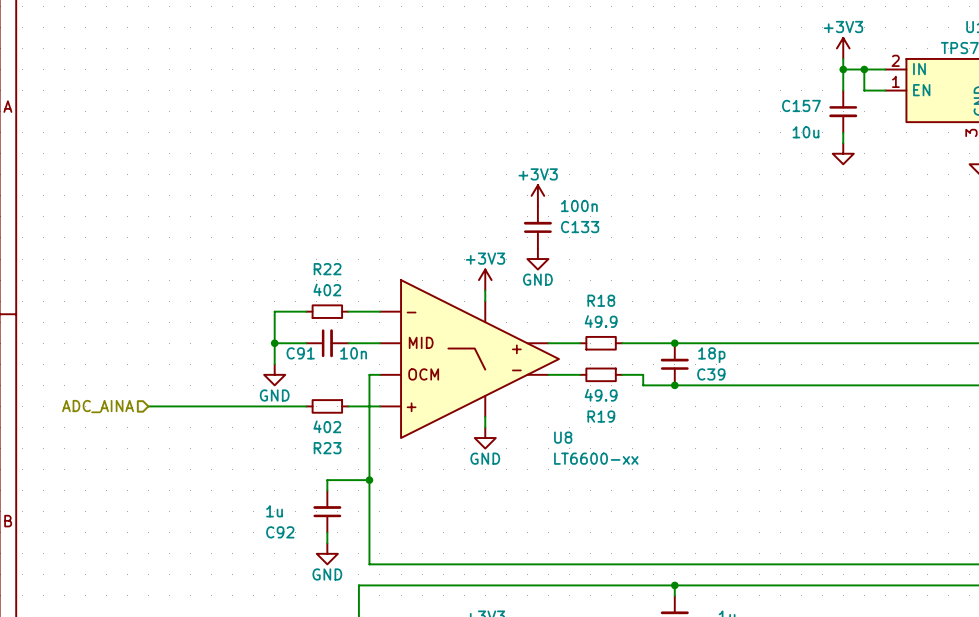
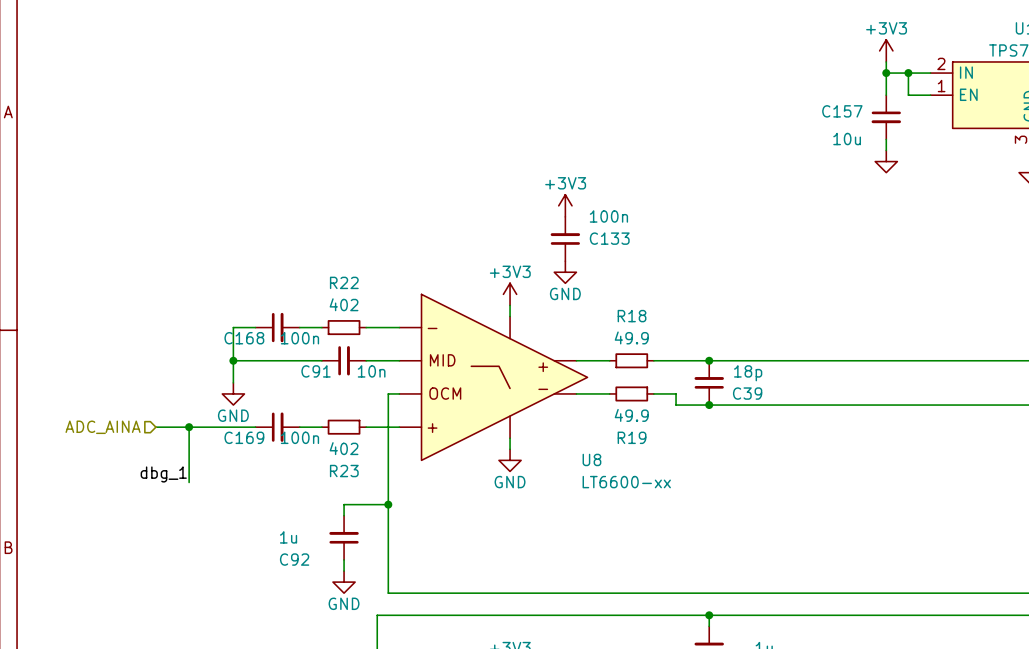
wire: none -> (255, 327) (233, 327) (233, 382)
C168: none -> 100n (277, 327)
wire: (285, 311) (274, 311) (274, 364) -> none
wire: none -> (233, 360) (288, 360)
junction: none -> (233, 360)
junction: (274, 343) -> none
power symbol position: GND (274, 374) -> GND (233, 393)
wire: none -> (189, 427) (189, 482)
junction: none -> (189, 427)
C169: none -> 100n (277, 427)
label: none -> dbg_1 (163, 474)

